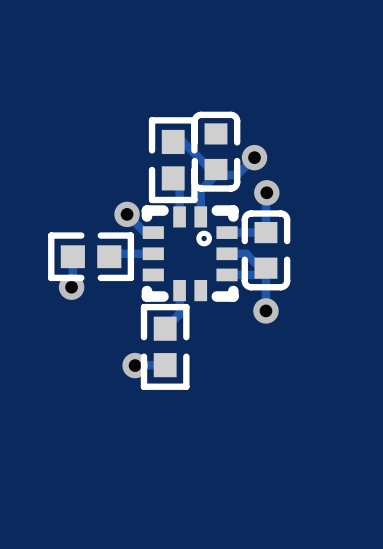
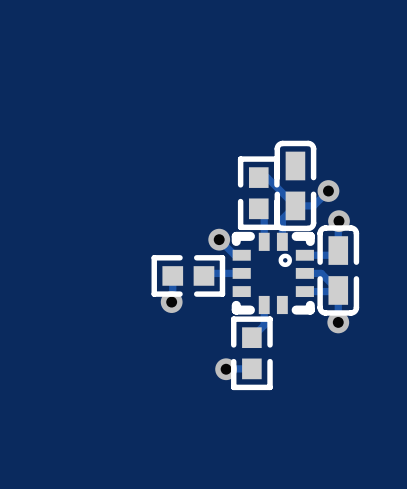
part footprint: [191, 111, 241, 192] -> [274, 140, 317, 232]
part footprint: [241, 210, 291, 291] -> [317, 225, 360, 316]

